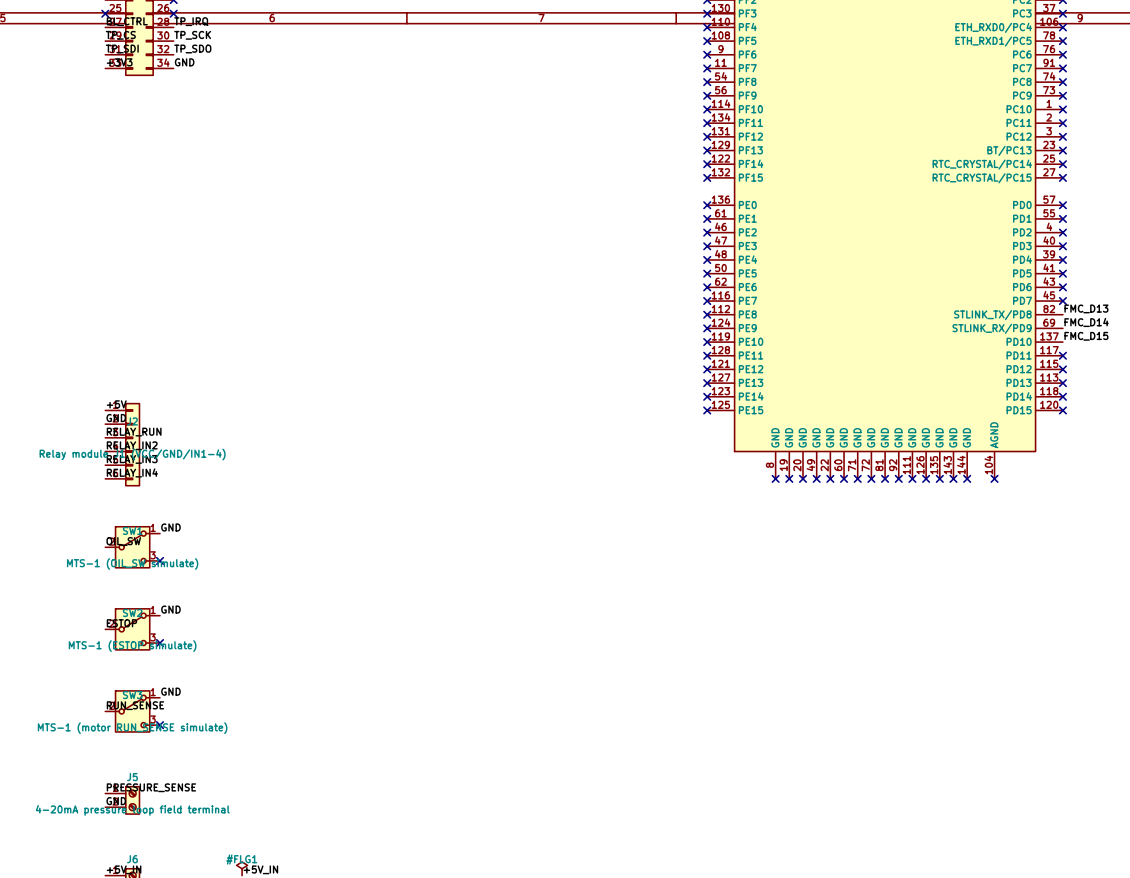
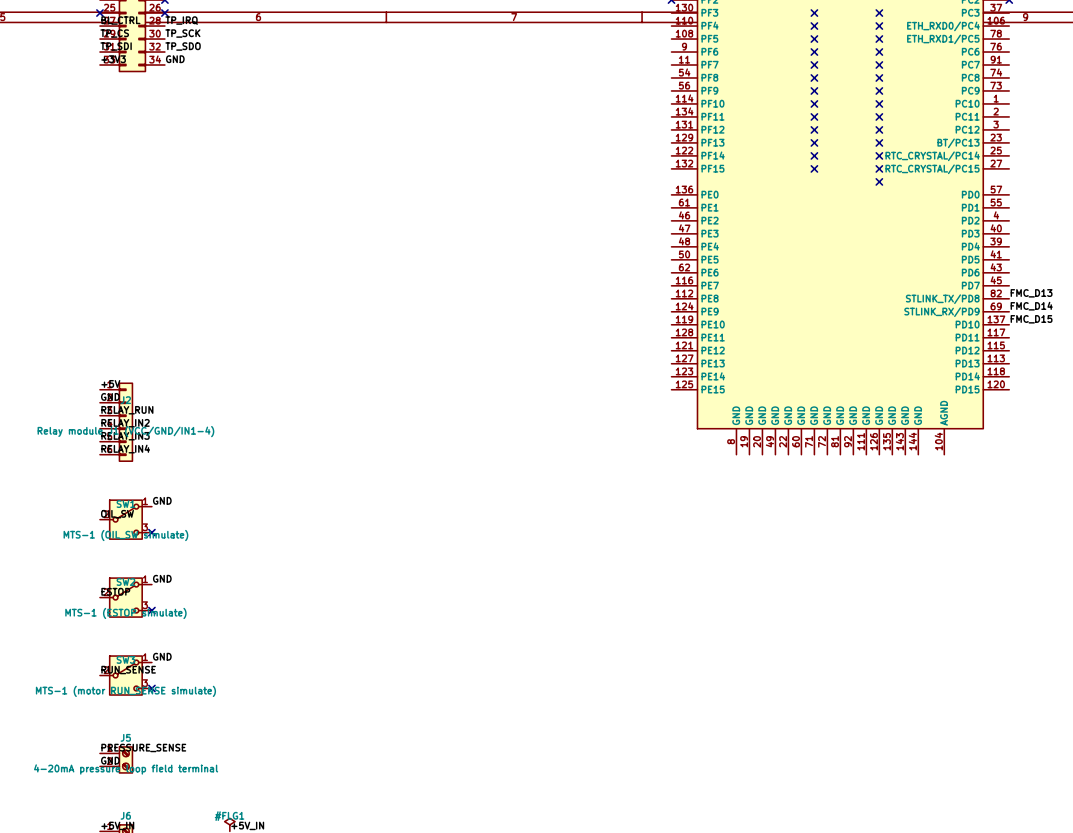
no-connect mark: (707, 13) -> none
no-connect mark: none -> (814, 13)
no-connect mark: none -> (879, 13)
no-connect mark: (1062, 13) -> none
no-connect mark: (707, 27) -> none
no-connect mark: none -> (814, 26)
no-connect mark: none -> (879, 26)
no-connect mark: (1062, 27) -> none
no-connect mark: (707, 41) -> none
no-connect mark: none -> (814, 39)
no-connect mark: none -> (879, 39)
no-connect mark: (1062, 41) -> none
no-connect mark: (707, 54) -> none
no-connect mark: none -> (814, 52)
no-connect mark: none -> (879, 52)
no-connect mark: (1062, 54) -> none
no-connect mark: (707, 68) -> none
no-connect mark: none -> (814, 65)
no-connect mark: none -> (879, 65)
no-connect mark: (1062, 68) -> none
no-connect mark: (707, 82) -> none
no-connect mark: none -> (814, 77)
no-connect mark: none -> (879, 77)
no-connect mark: (1062, 82) -> none
no-connect mark: (707, 95) -> none
no-connect mark: none -> (814, 90)
no-connect mark: none -> (879, 90)
no-connect mark: (1062, 95) -> none
no-connect mark: (707, 109) -> none
no-connect mark: none -> (814, 103)
no-connect mark: none -> (879, 103)
no-connect mark: (1062, 109) -> none
no-connect mark: (707, 123) -> none
no-connect mark: none -> (814, 116)
no-connect mark: none -> (879, 116)
no-connect mark: (1062, 123) -> none
no-connect mark: (707, 136) -> none
no-connect mark: none -> (814, 129)
no-connect mark: none -> (879, 129)
no-connect mark: (1062, 136) -> none
no-connect mark: (707, 150) -> none
no-connect mark: none -> (814, 142)
no-connect mark: none -> (879, 142)
no-connect mark: (1062, 150) -> none
no-connect mark: (707, 164) -> none
no-connect mark: none -> (814, 155)
no-connect mark: none -> (879, 155)
no-connect mark: (1062, 164) -> none
no-connect mark: (707, 177) -> none
no-connect mark: none -> (814, 168)
no-connect mark: none -> (879, 168)
no-connect mark: (1062, 177) -> none
no-connect mark: none -> (879, 181)
no-connect mark: (707, 205) -> none
no-connect mark: (1062, 205) -> none
no-connect mark: (707, 218) -> none
no-connect mark: (1062, 218) -> none
no-connect mark: (707, 232) -> none
no-connect mark: (1062, 232) -> none
no-connect mark: (707, 246) -> none
no-connect mark: (1062, 246) -> none
no-connect mark: (707, 259) -> none
no-connect mark: (1062, 259) -> none
no-connect mark: (707, 273) -> none
no-connect mark: (1062, 273) -> none
no-connect mark: (707, 287) -> none
no-connect mark: (1062, 287) -> none
no-connect mark: (707, 301) -> none
no-connect mark: (1062, 301) -> none
no-connect mark: (707, 314) -> none
no-connect mark: (707, 328) -> none
no-connect mark: (707, 342) -> none
no-connect mark: (707, 355) -> none
no-connect mark: (1062, 355) -> none
no-connect mark: (707, 369) -> none
no-connect mark: (1062, 369) -> none
no-connect mark: (707, 383) -> none
no-connect mark: (1062, 383) -> none
no-connect mark: (707, 396) -> none
no-connect mark: (1062, 396) -> none
no-connect mark: (707, 410) -> none
no-connect mark: (1062, 410) -> none
no-connect mark: (775, 478) -> none
no-connect mark: (789, 478) -> none
no-connect mark: (802, 478) -> none
no-connect mark: (816, 478) -> none
no-connect mark: (830, 478) -> none
no-connect mark: (844, 478) -> none
no-connect mark: (857, 478) -> none
no-connect mark: (871, 478) -> none
no-connect mark: (885, 478) -> none
no-connect mark: (898, 478) -> none
no-connect mark: (912, 478) -> none
no-connect mark: (926, 478) -> none
no-connect mark: (939, 478) -> none
no-connect mark: (953, 478) -> none
no-connect mark: (967, 478) -> none
no-connect mark: (994, 478) -> none

